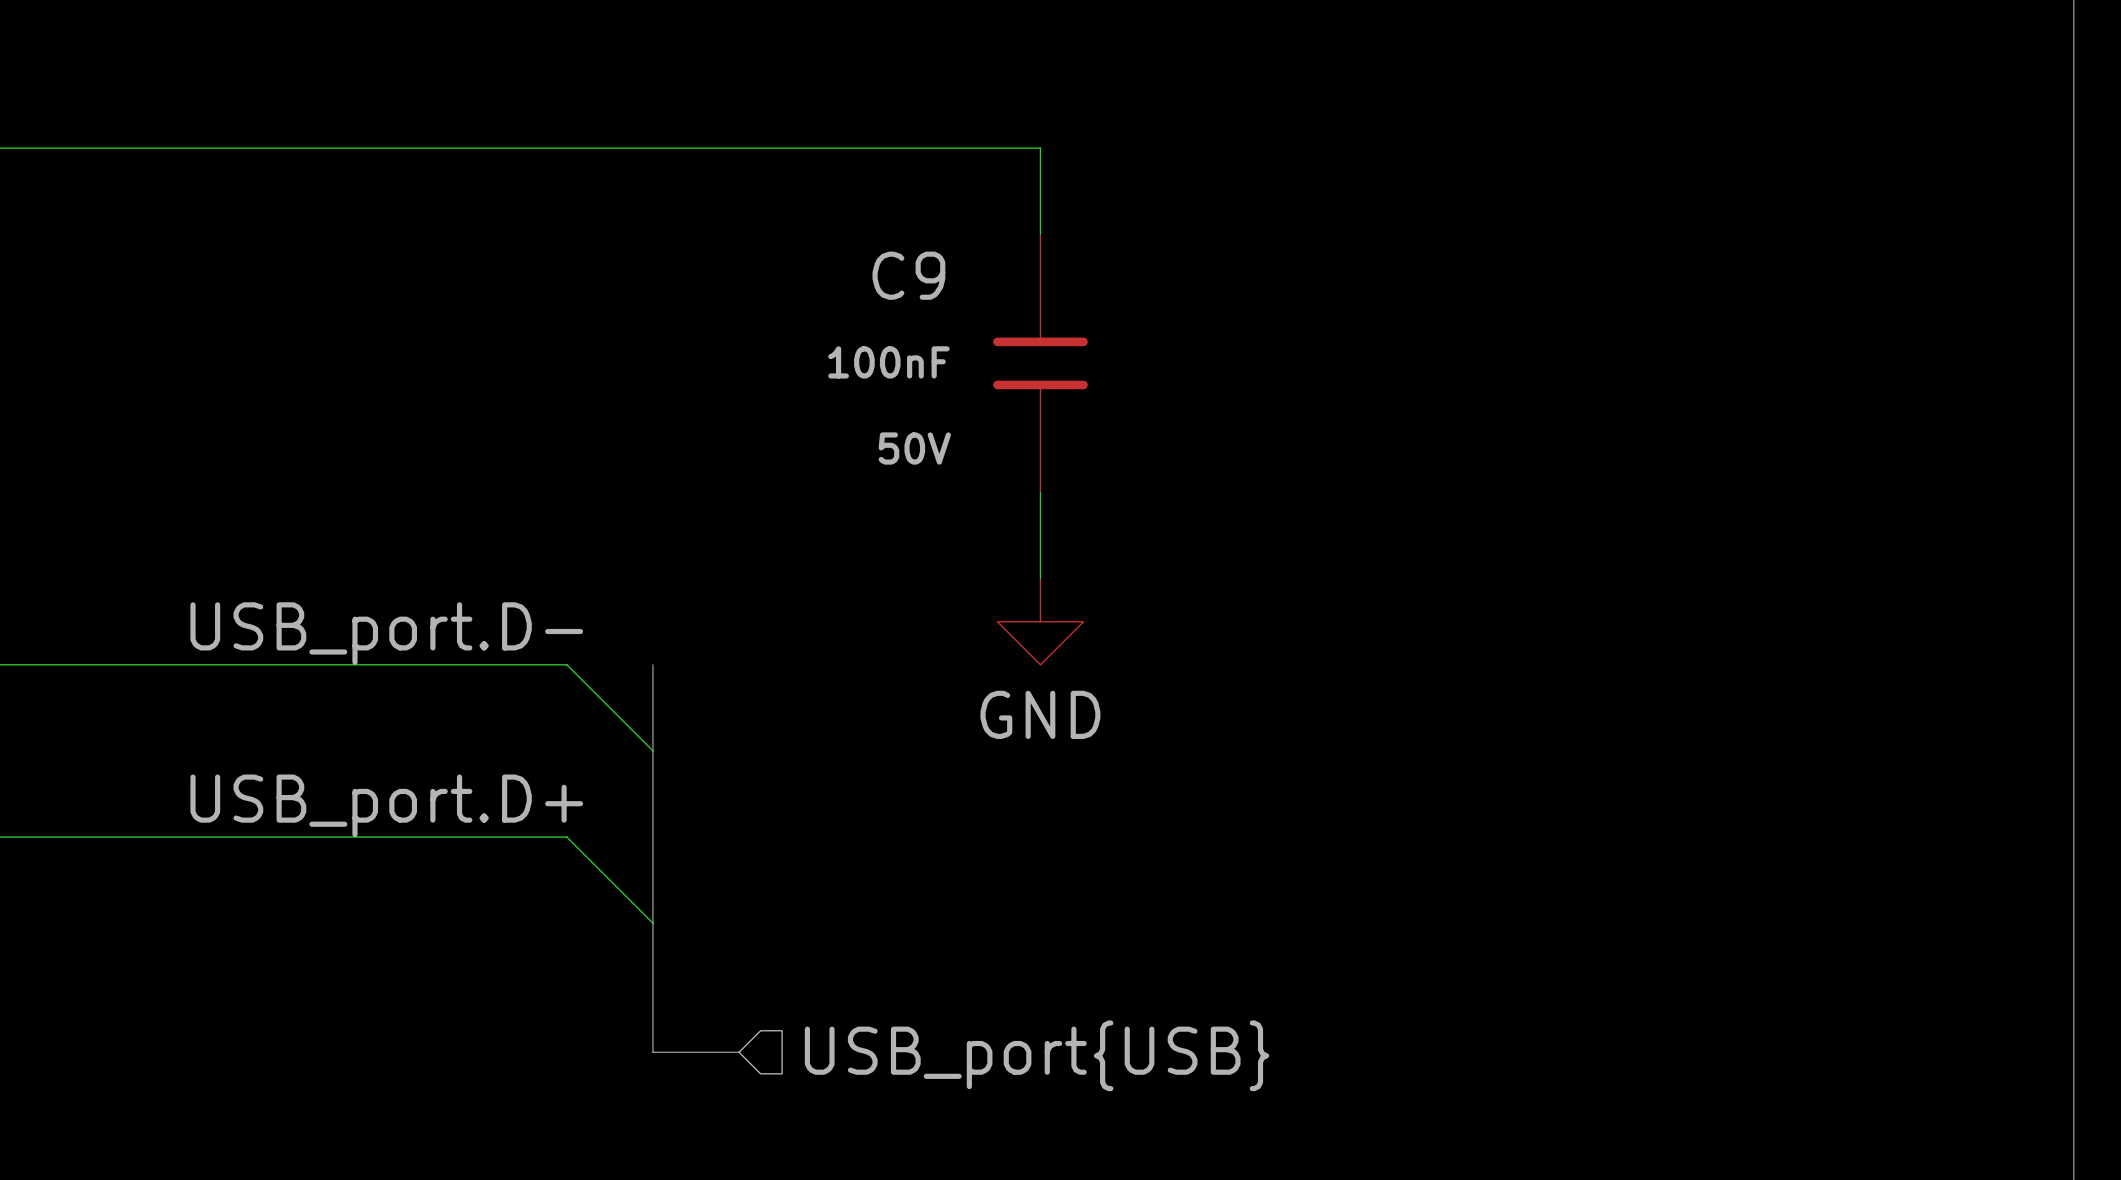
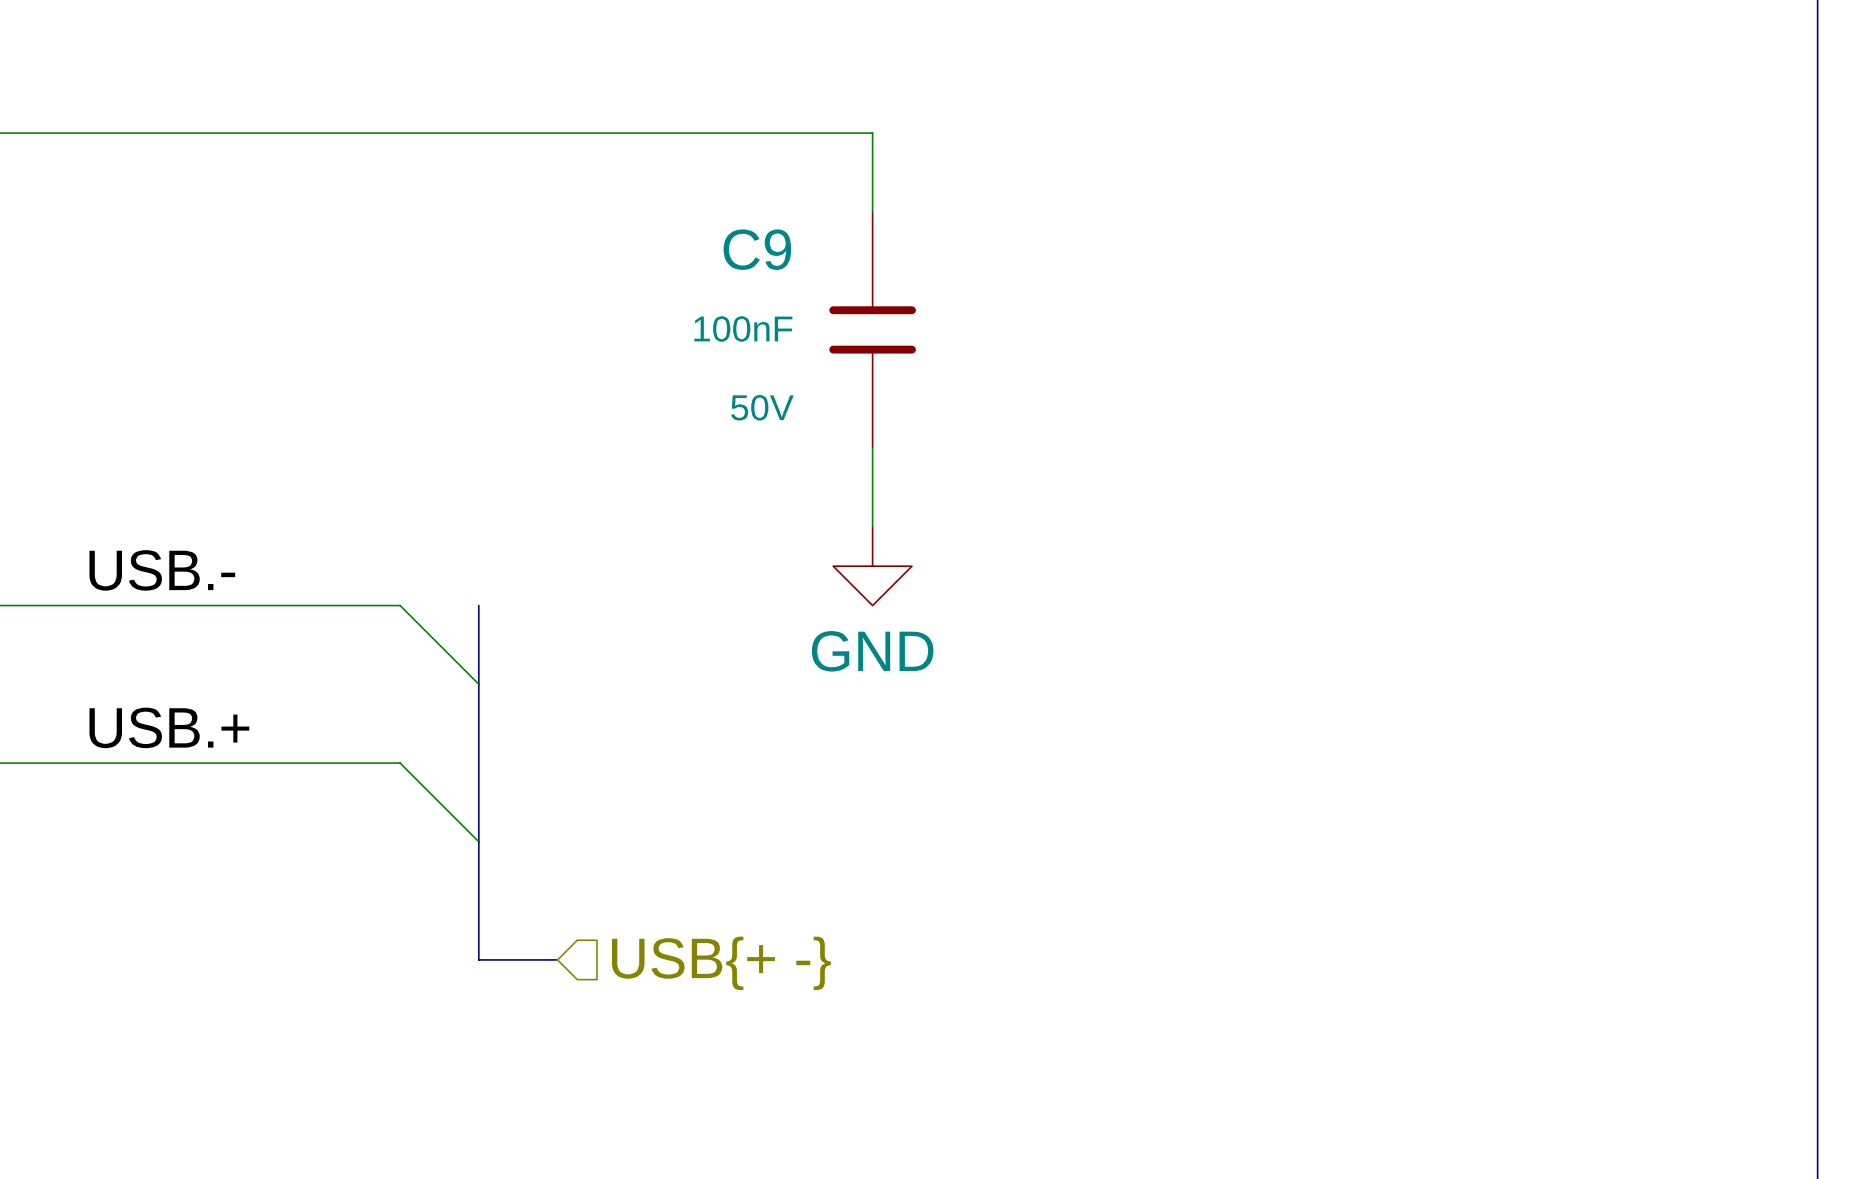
label: USB_port.D- (386, 633) -> USB.- (162, 570)
wire: (523, 664) (566, 664) (652, 750) -> (400, 605) (478, 684)
bus: (652, 664) (652, 1052) -> (478, 605) (478, 959) (518, 959)
label: USB_port.D+ (386, 805) -> USB.+ (169, 727)
wire: (523, 837) (566, 837) (652, 923) -> (400, 763) (478, 841)
bus: (696, 1052) (739, 1052) -> none
hierarchical label: none -> USB{+ -} (721, 963)
hierarchical label: USB_port{USB} (1037, 1055) -> none

